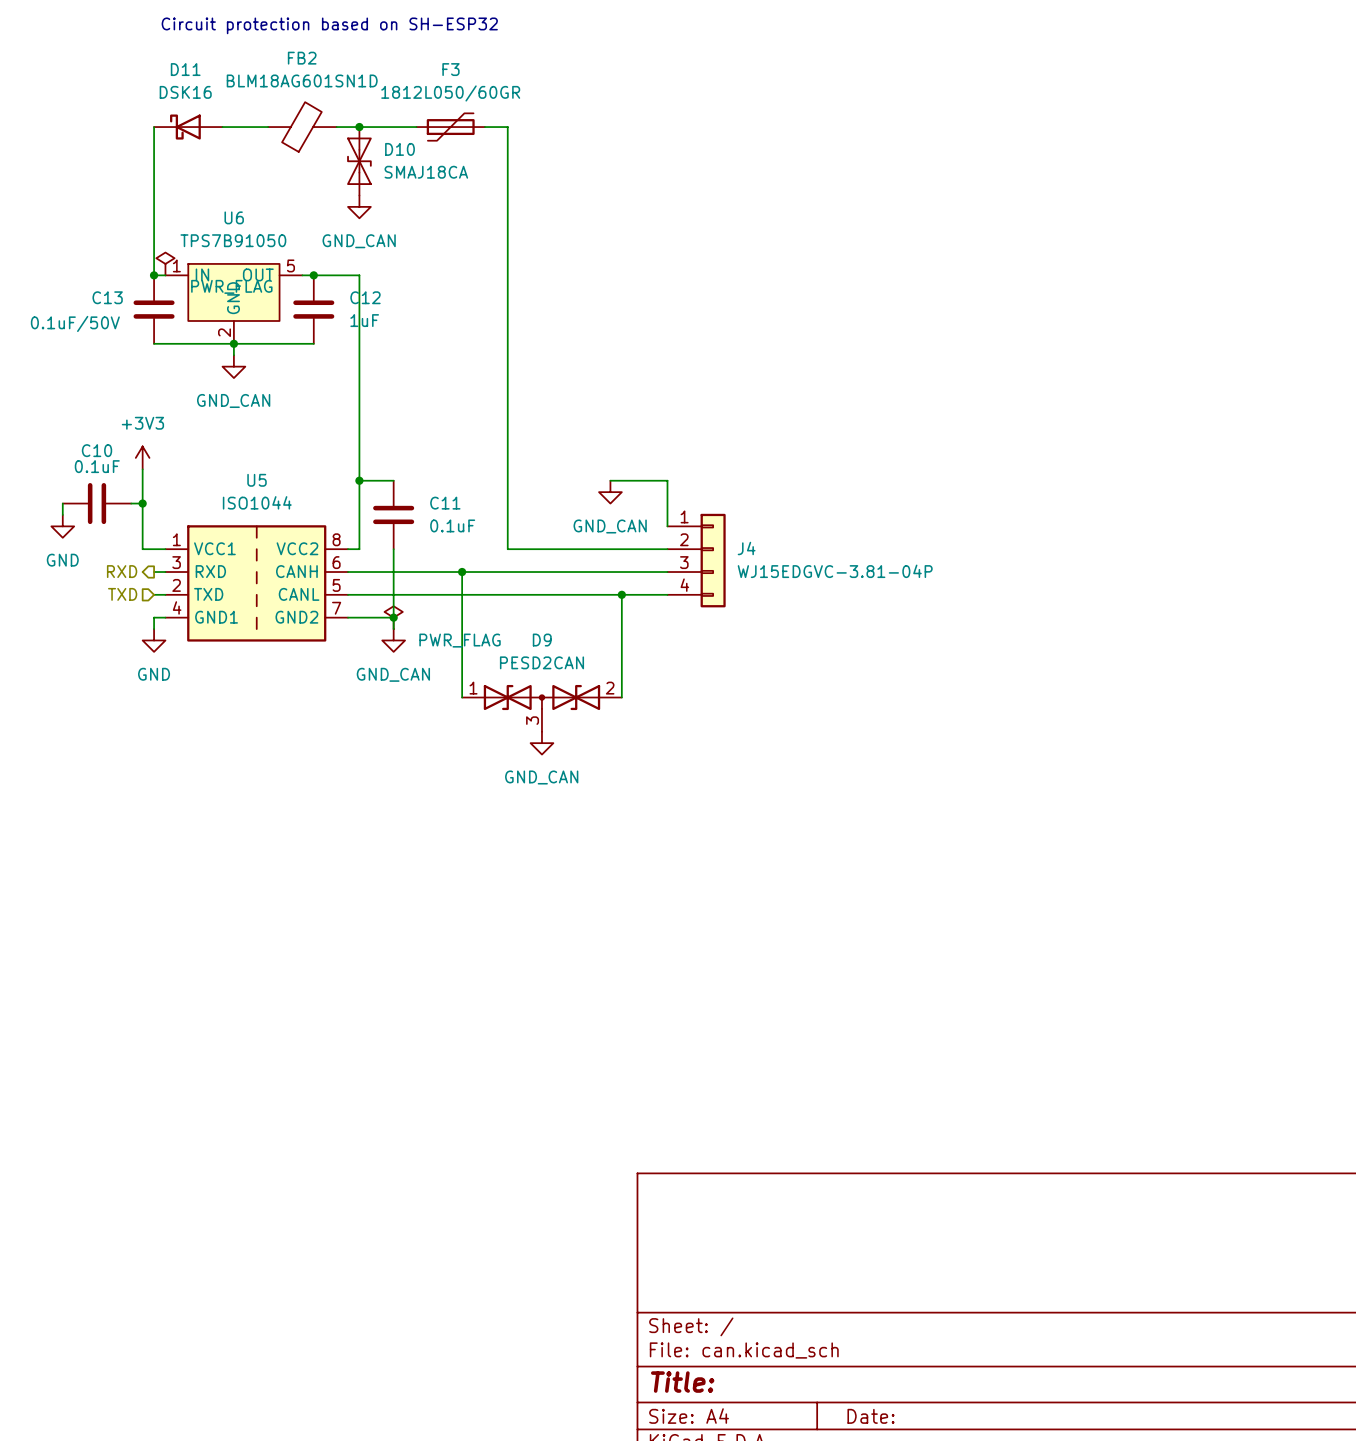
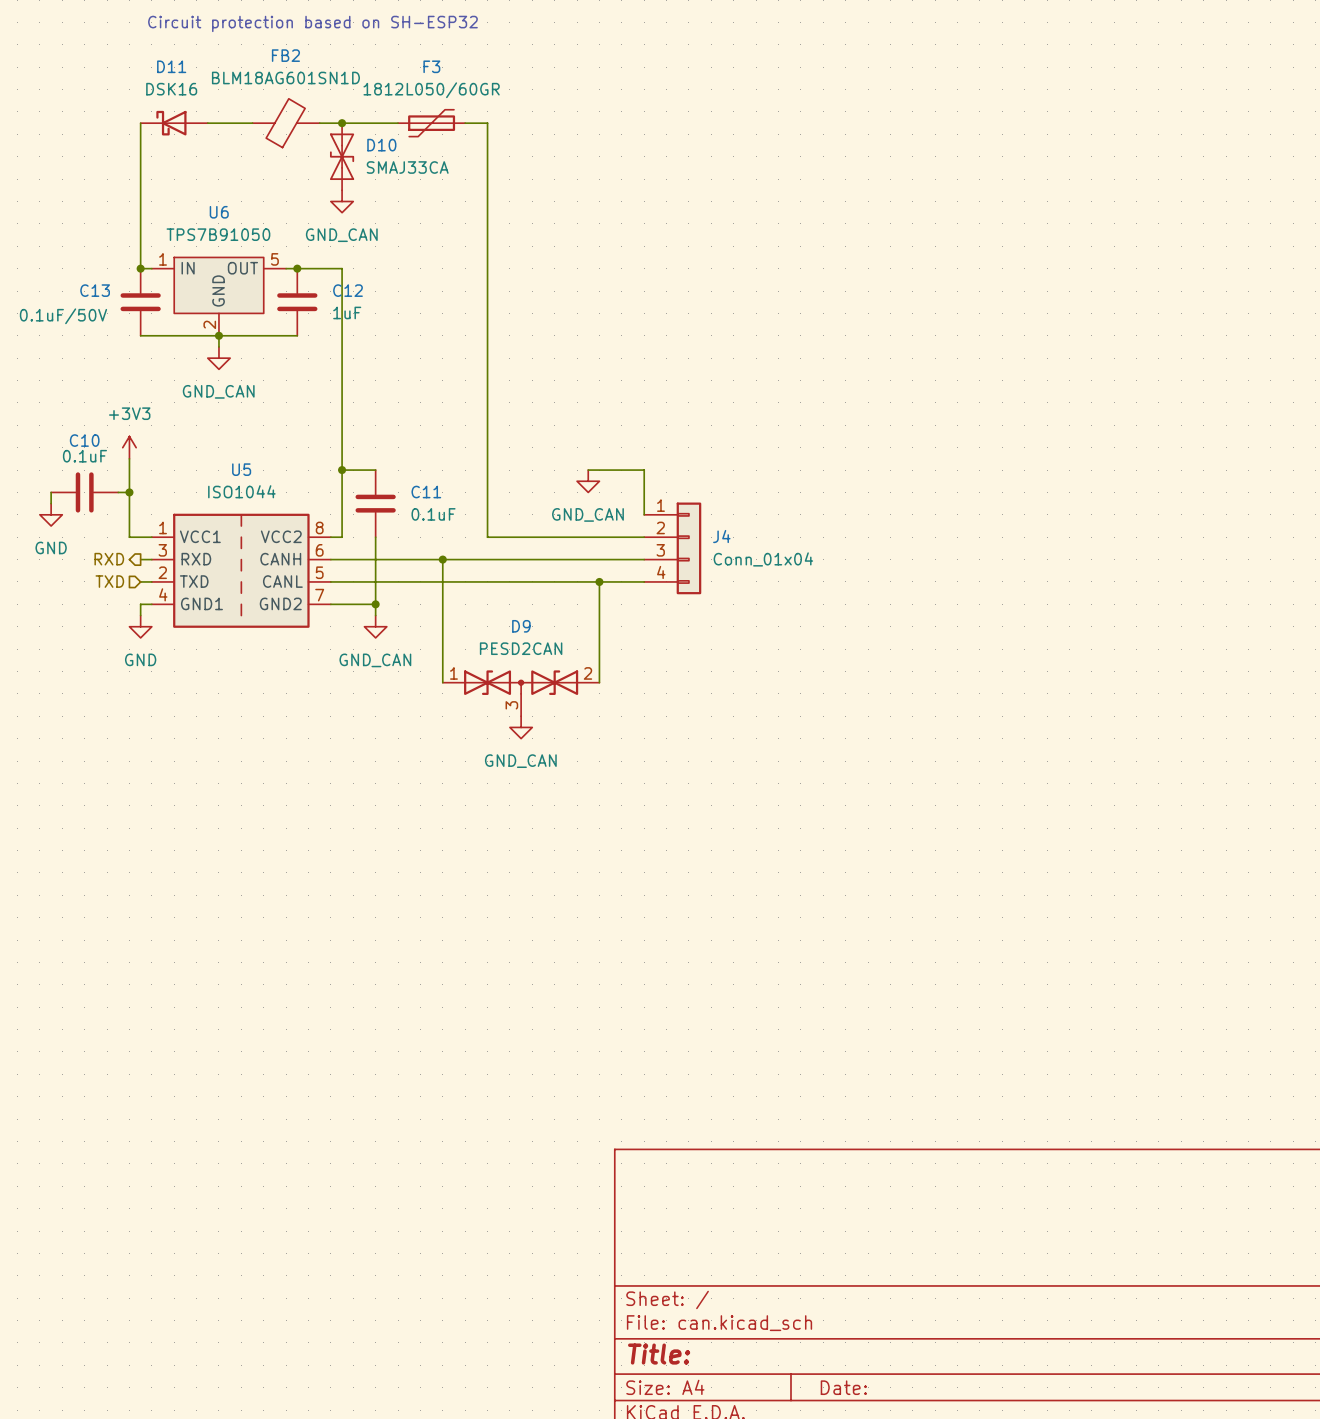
D10 value: SMAJ18CA (426, 172) -> SMAJ33CA (407, 167)
power symbol: PWR_FLAG (165, 263) -> none
J4 value: WJ15EDGVC-3.81-04P (835, 571) -> Conn_01x04 (763, 559)
power symbol: PWR_FLAG (393, 617) -> none

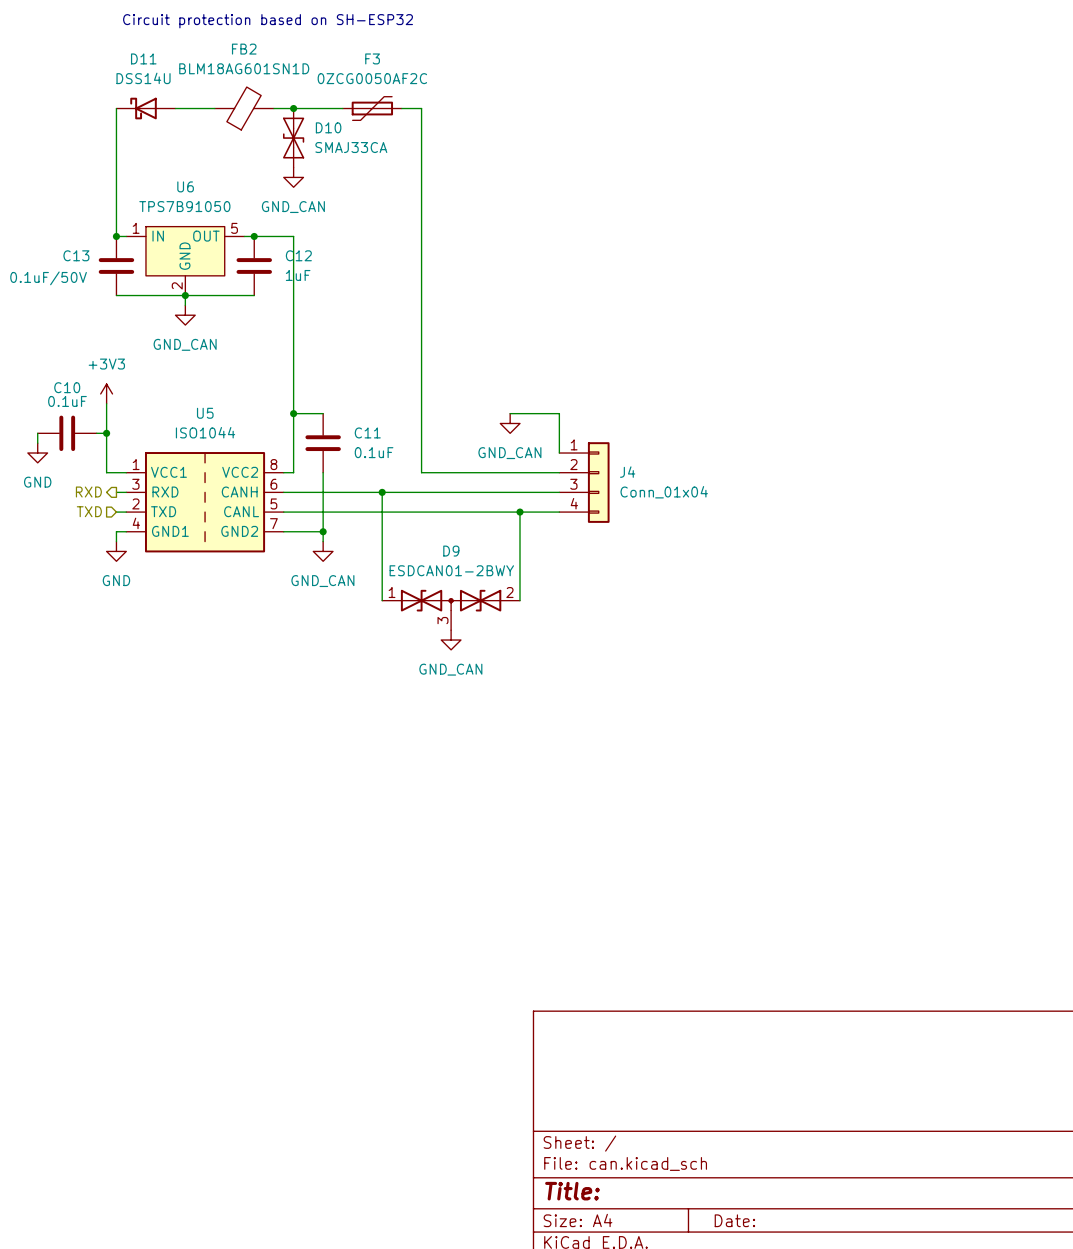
D11 value: DSK16 (171, 89) -> DSS14U (143, 78)
F3 value: 1812L050/60GR (431, 90) -> 0ZCG0050AF2C (372, 78)
D9 value: PESD2CAN (521, 648) -> ESDCAN01-2BWY (451, 570)

